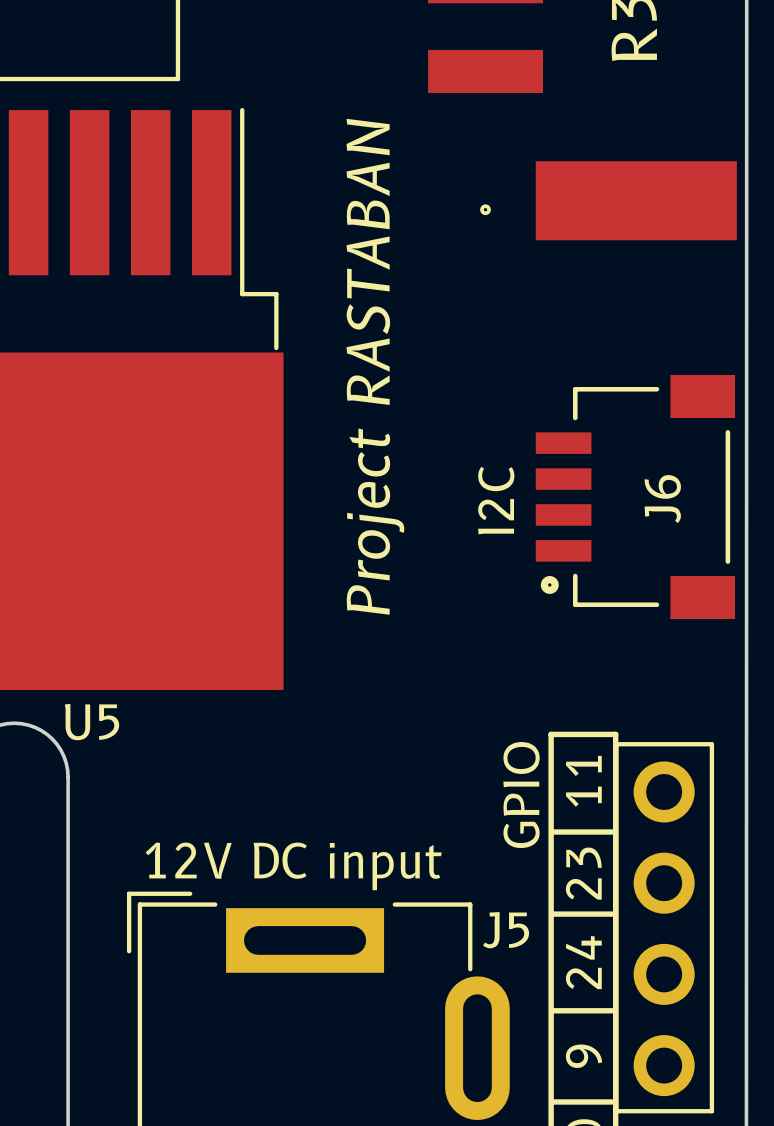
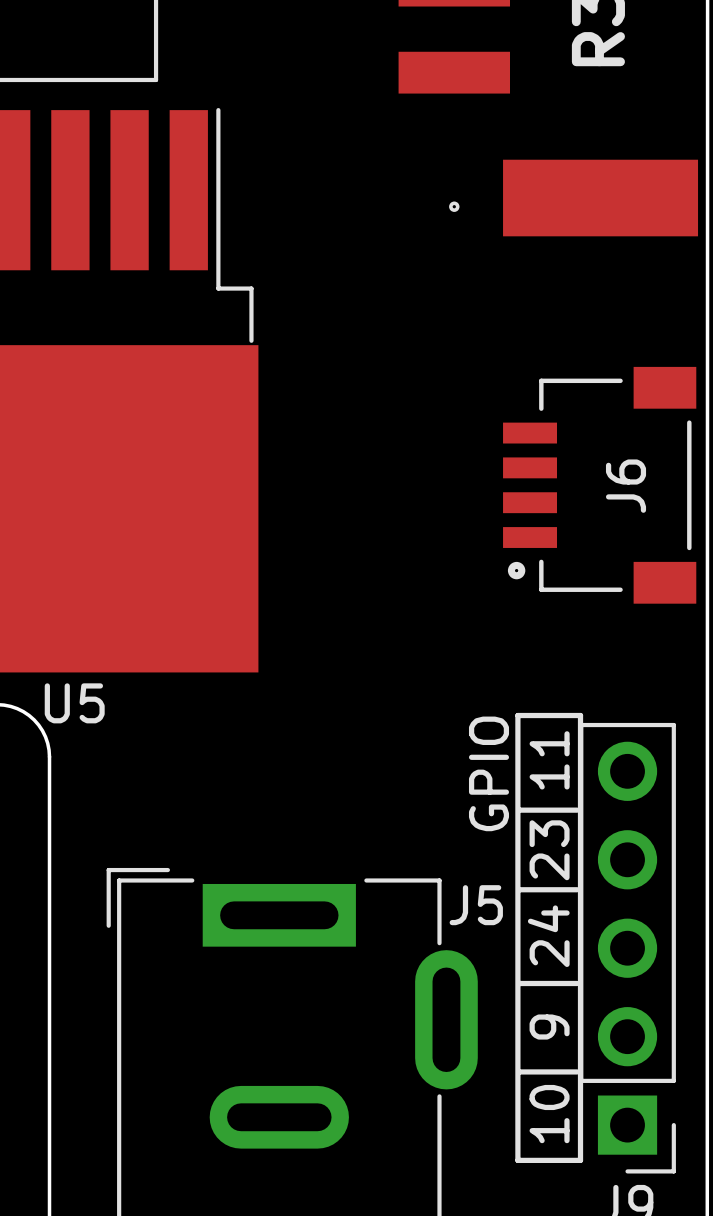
text: Project RASTABAN (375, 366) -> none
text: I2C (496, 500) -> none
text: 12V DC input (293, 866) -> none

